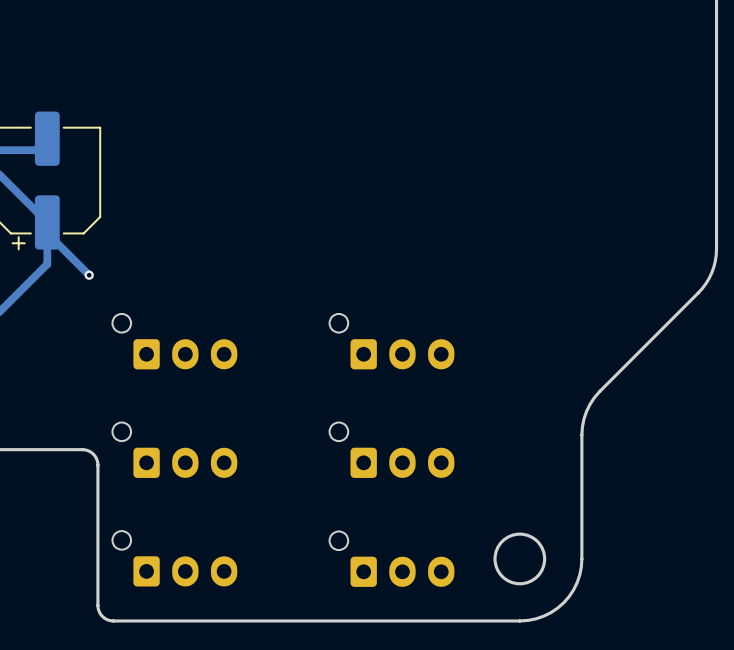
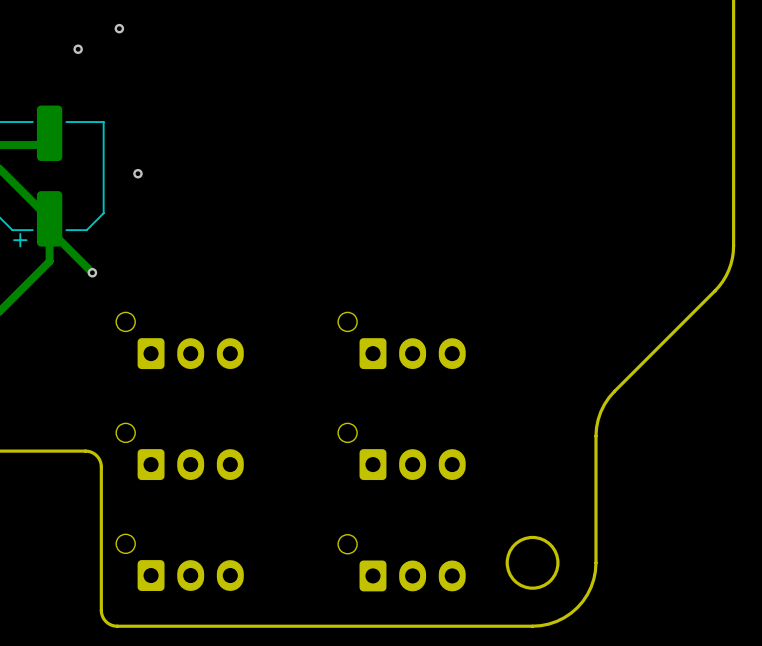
via: none -> (119, 28)
via: none -> (78, 49)
via: none -> (137, 173)

